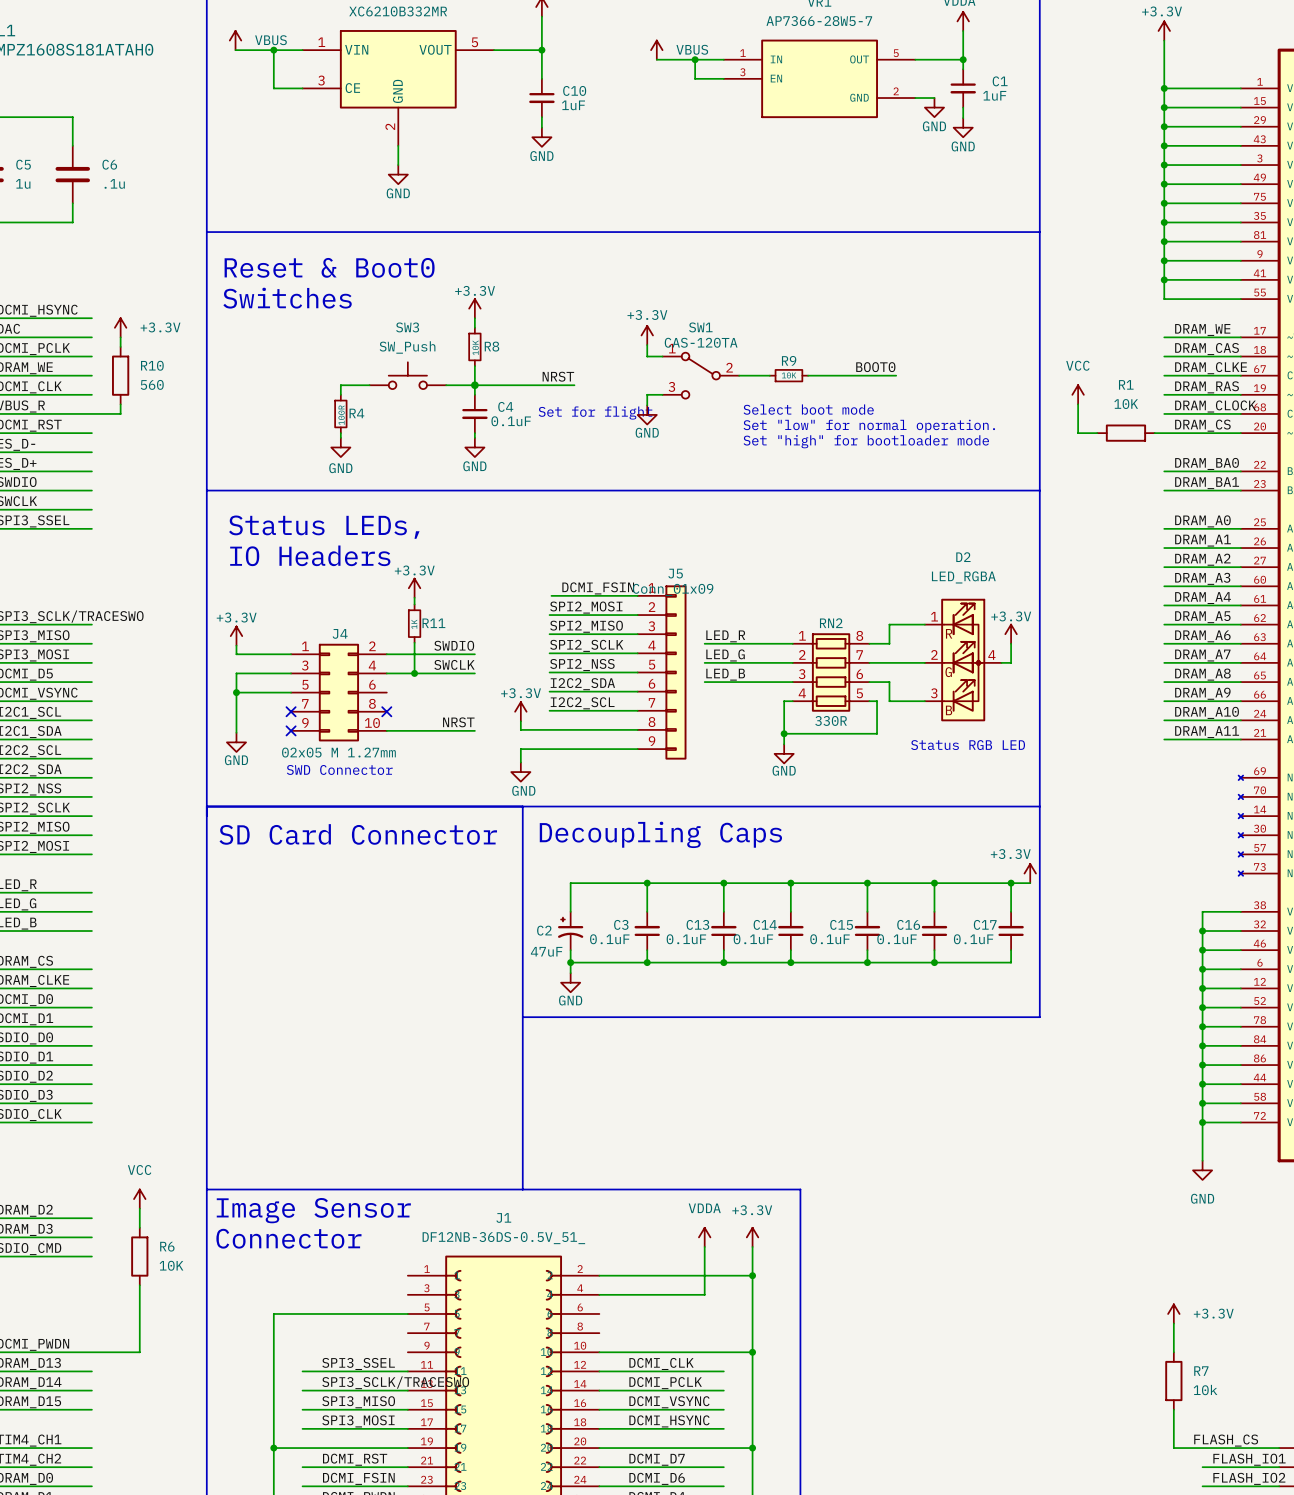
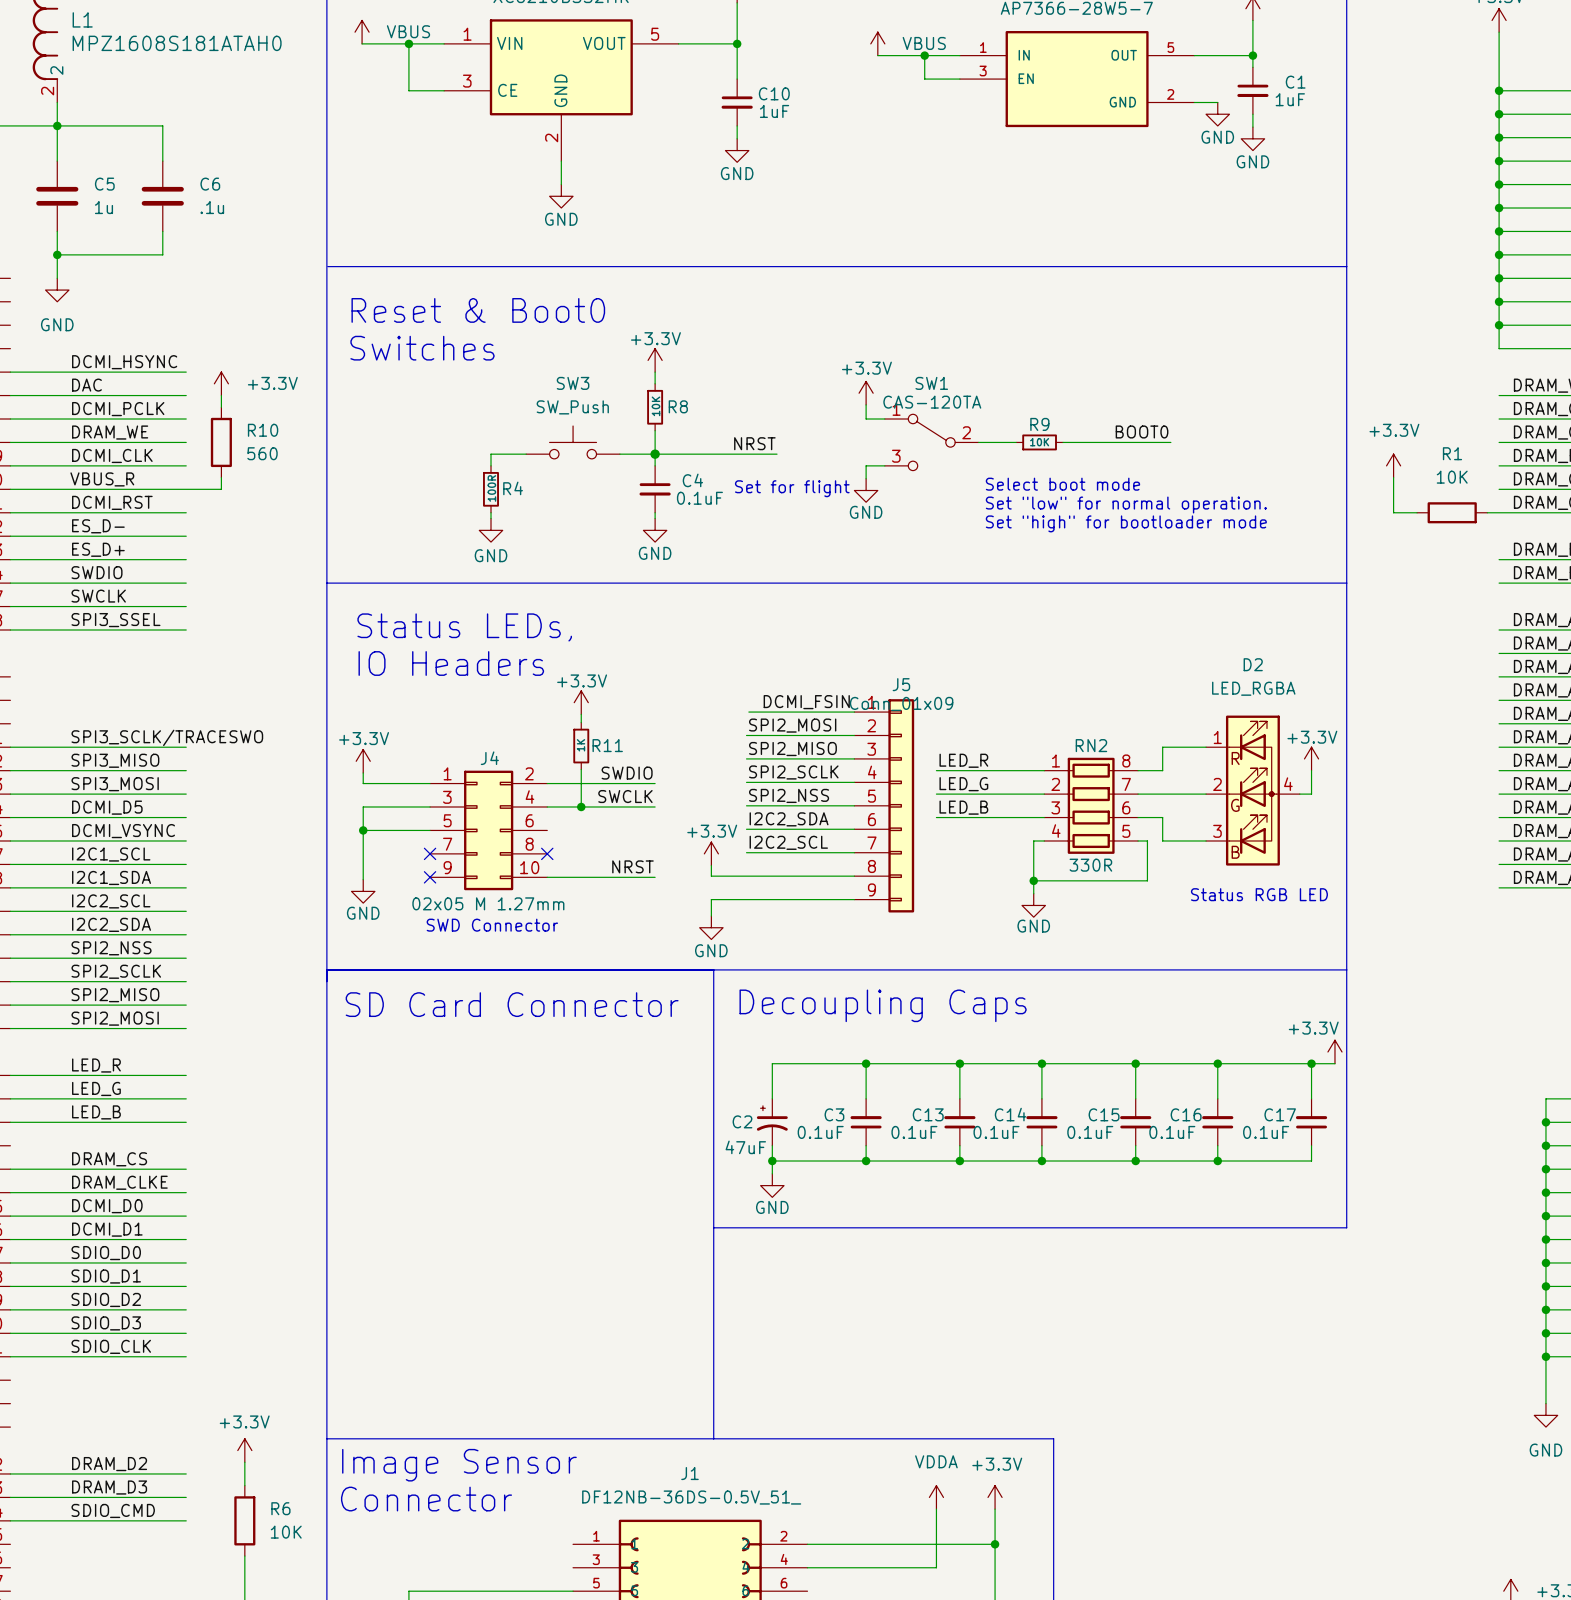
power symbol: VCC (1078, 394) -> +3.3V (1393, 465)
power symbol: VCC (139, 1199) -> +3.3V (244, 1450)

